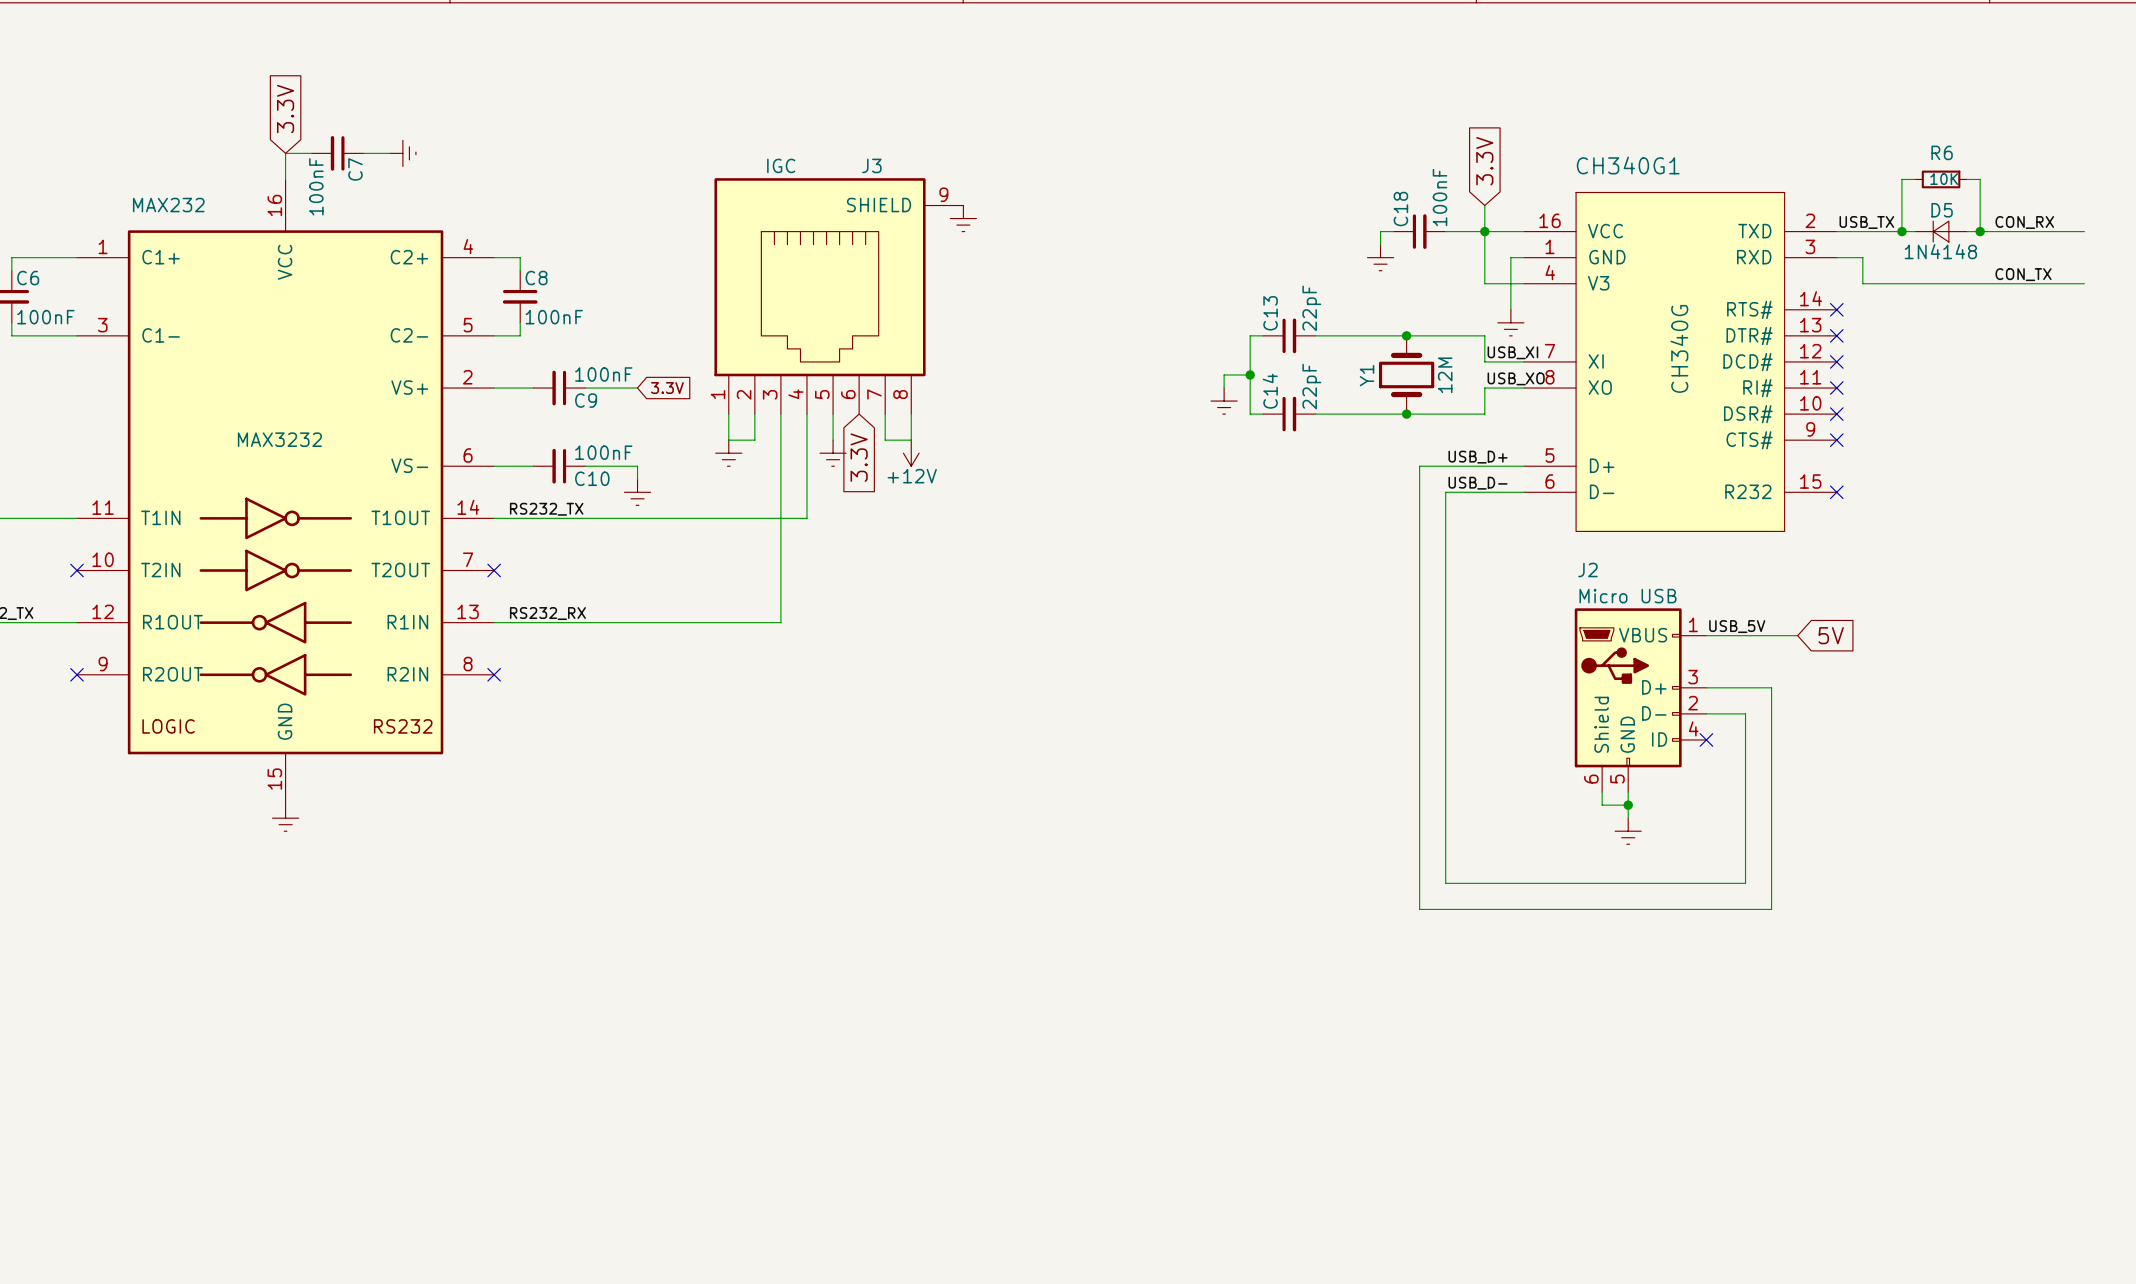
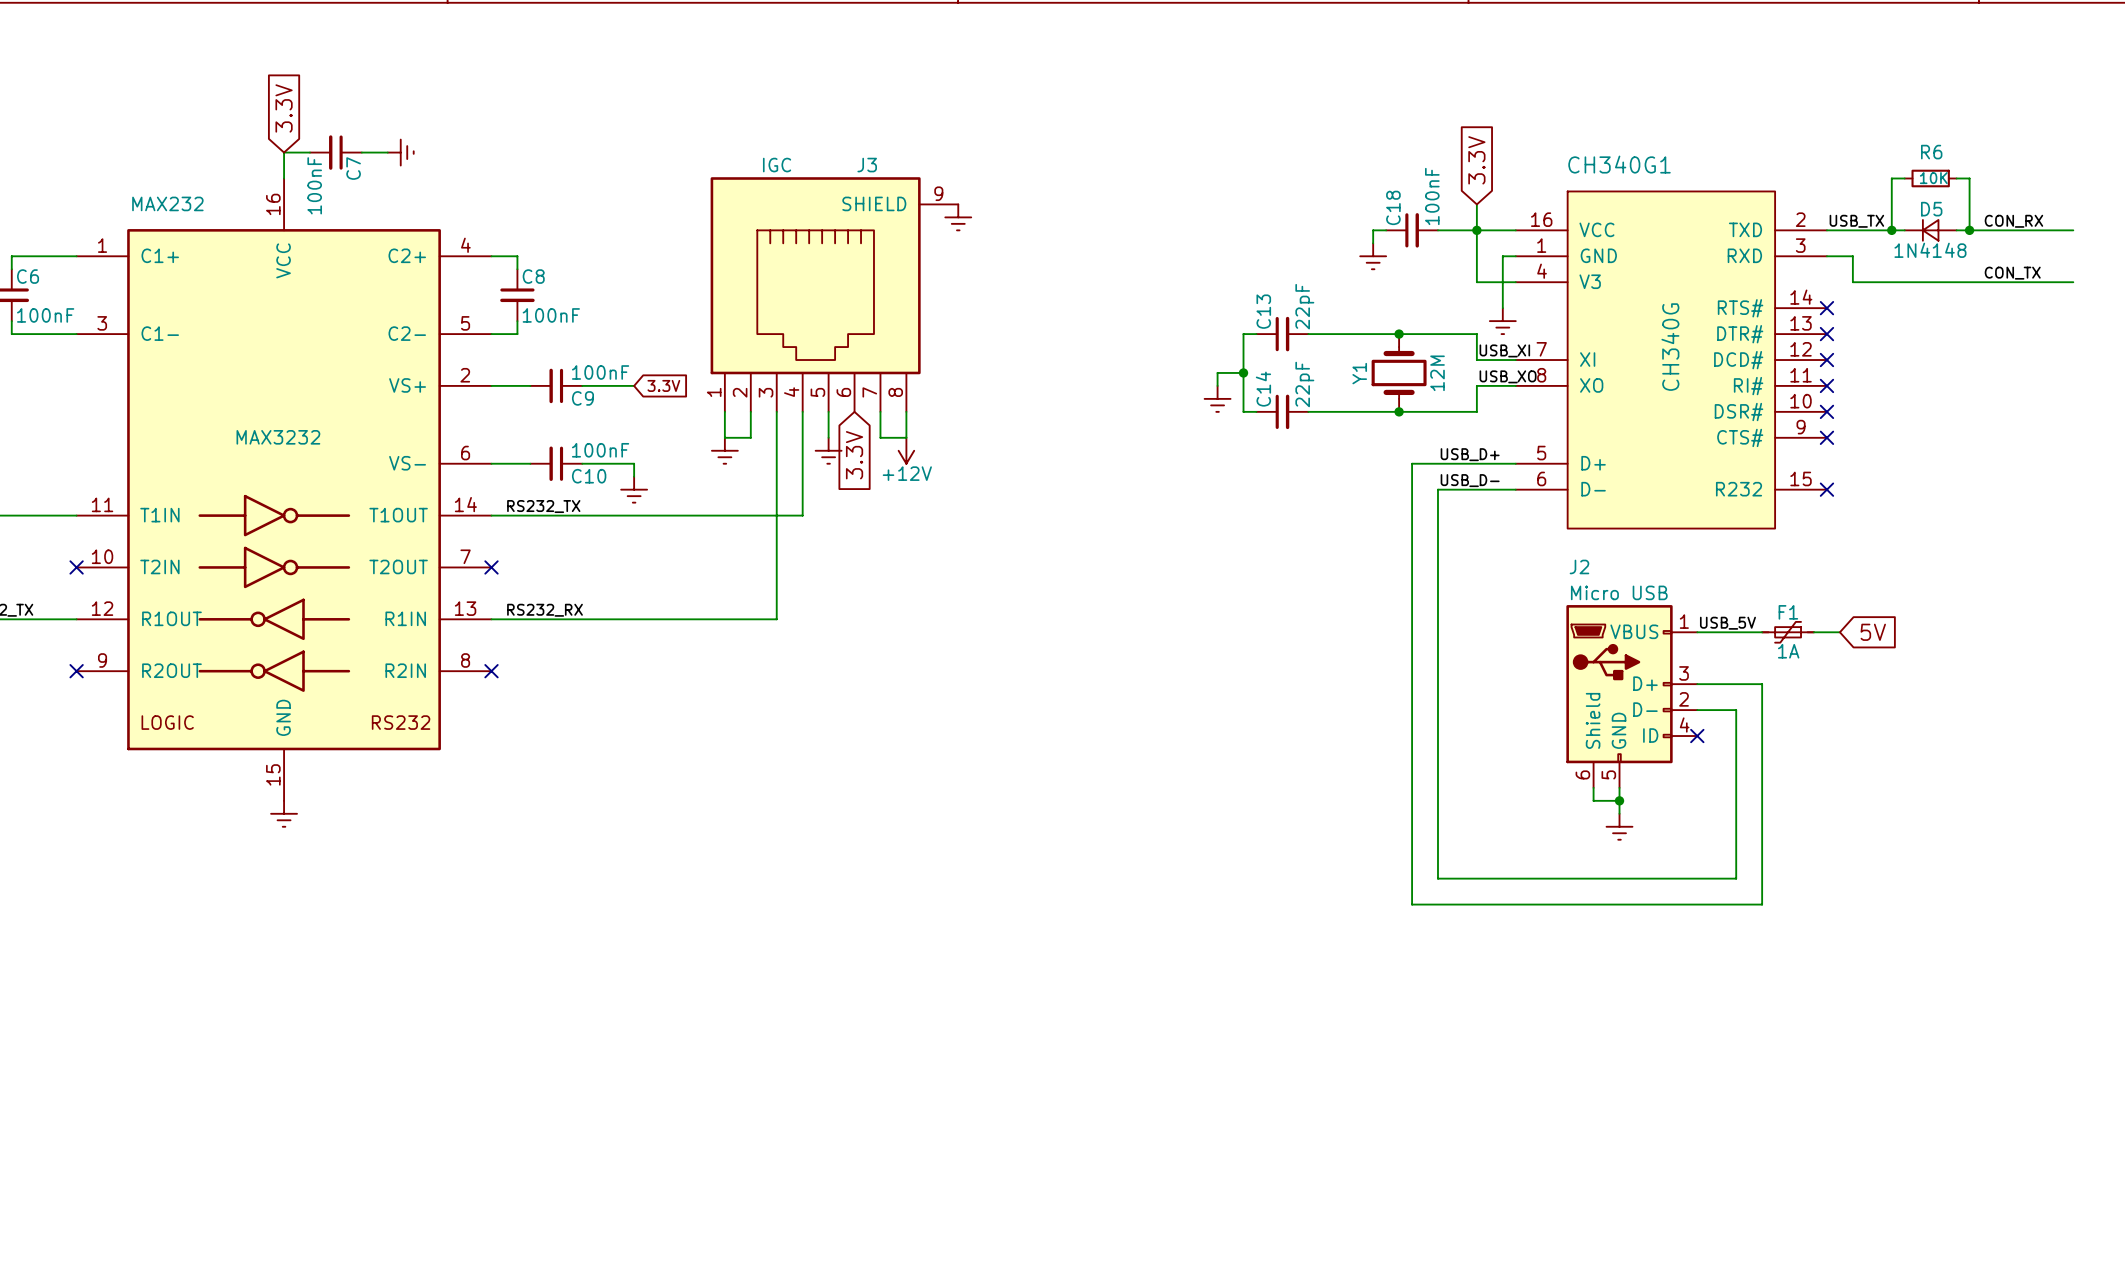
F1: none -> 1A (1788, 632)
global label position: 5V (1831, 635) -> 5V (1873, 632)

